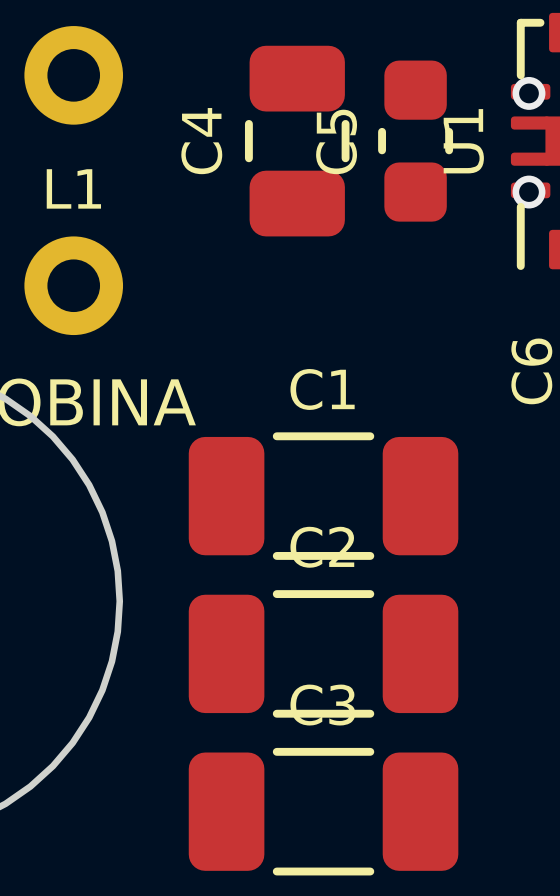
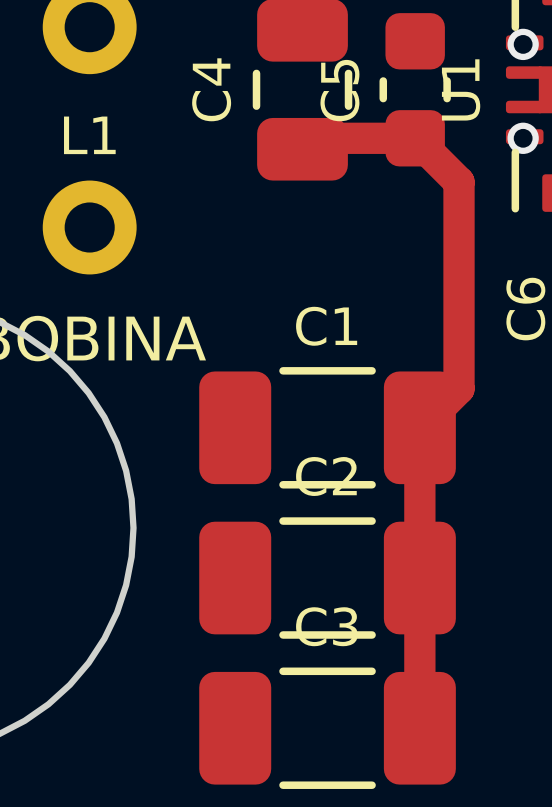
top track: none -> (302, 149) (313, 138) (415, 138) (459, 182) (459, 388) (419, 427) (419, 728)

